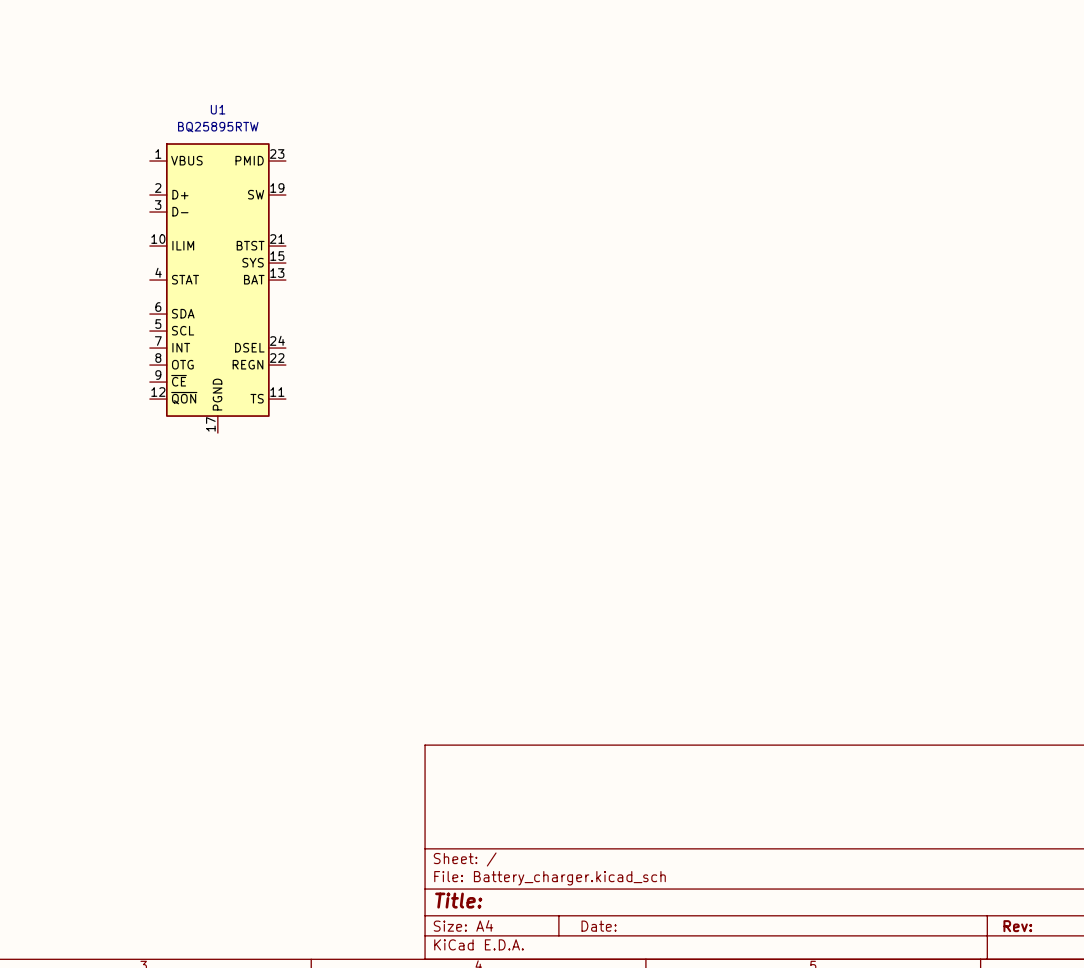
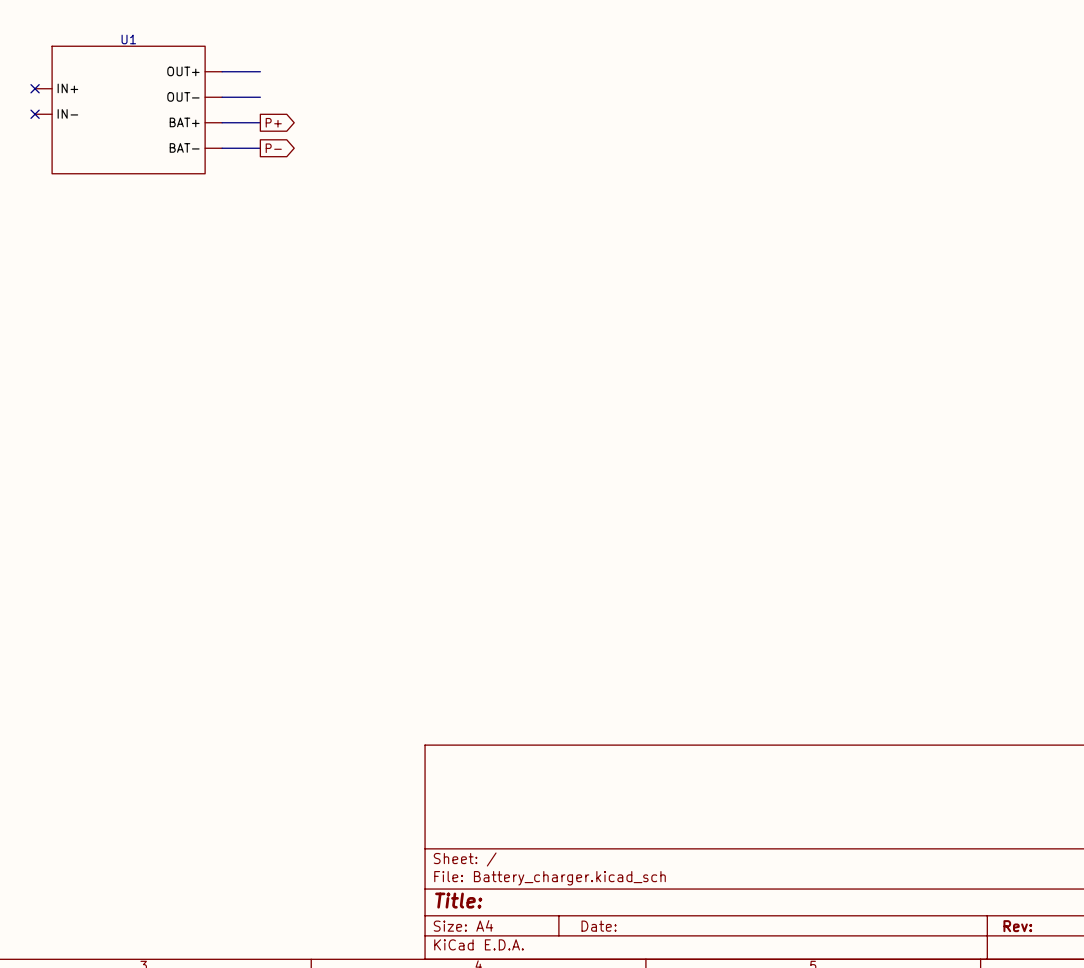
wire: none -> (222, 71) (260, 71)
no-connect mark: none -> (35, 88)
wire: none -> (222, 97) (260, 97)
U1 name position: U1 (218, 109) -> U1 (128, 39)
no-connect mark: none -> (35, 114)
global label: none -> P+ (273, 122)
U1 value: BQ25895RTW (218, 127) -> none
U1 symbol: [149, 143, 286, 434] -> [35, 46, 223, 174]
global label: none -> P- (273, 148)

